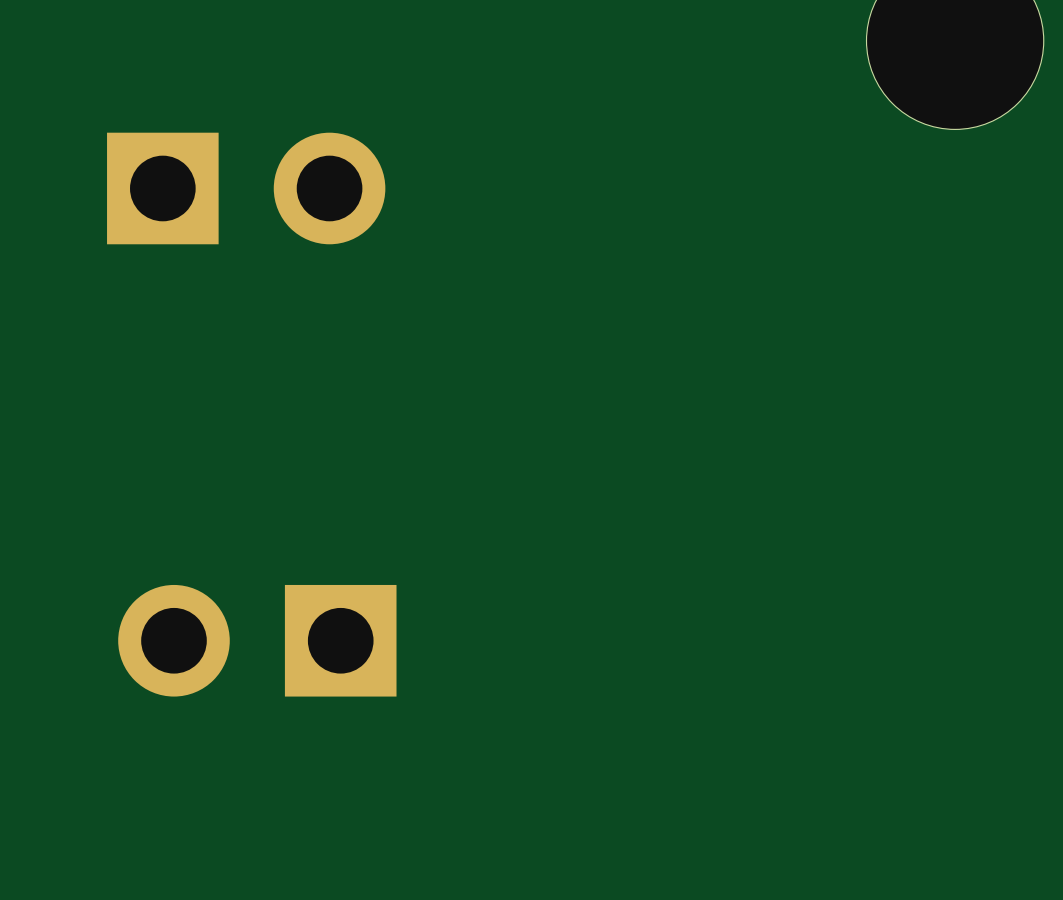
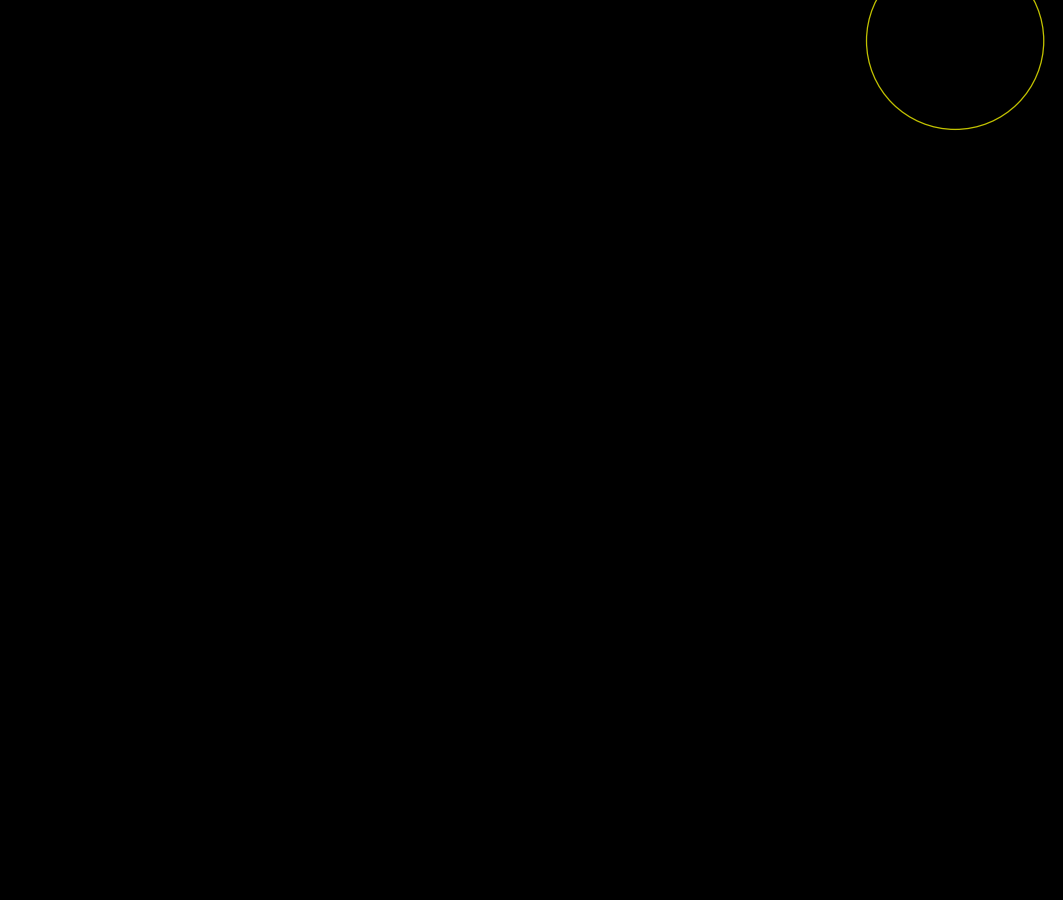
part: (246, 188) -> none
part: (257, 640) -> none

